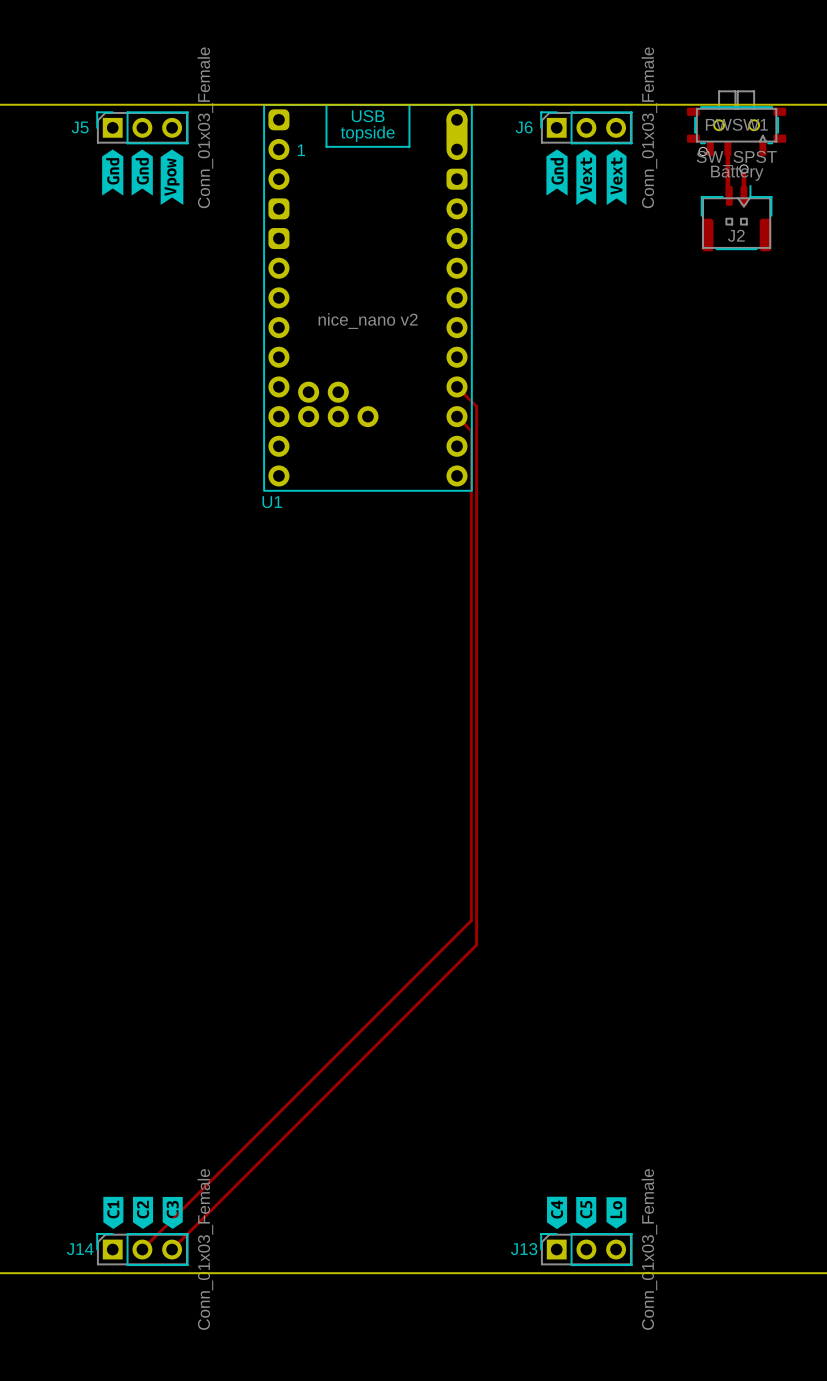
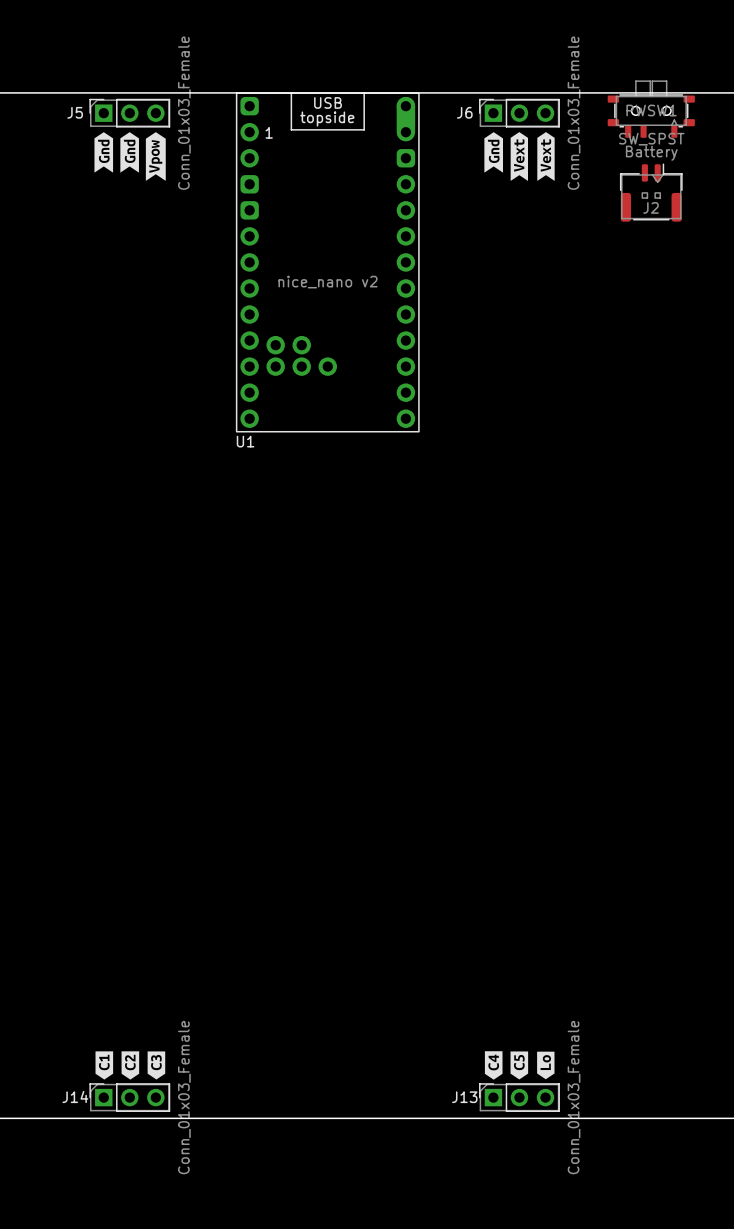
track: (727, 148) (729, 195) -> none
via: (703, 151) -> none
track: (743, 169) (743, 195) -> none
via: (743, 169) -> none
track: (457, 386) (476, 406) (476, 945) (172, 1249) -> none
track: (457, 416) (471, 430) (471, 920) (142, 1249) -> none

